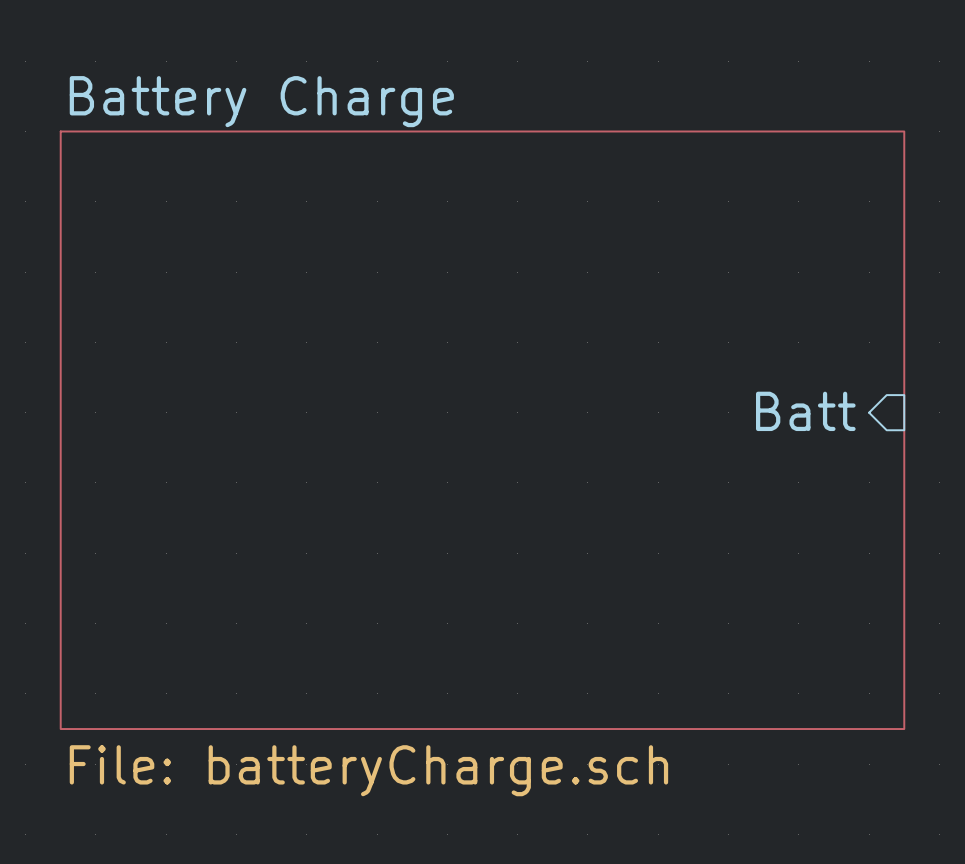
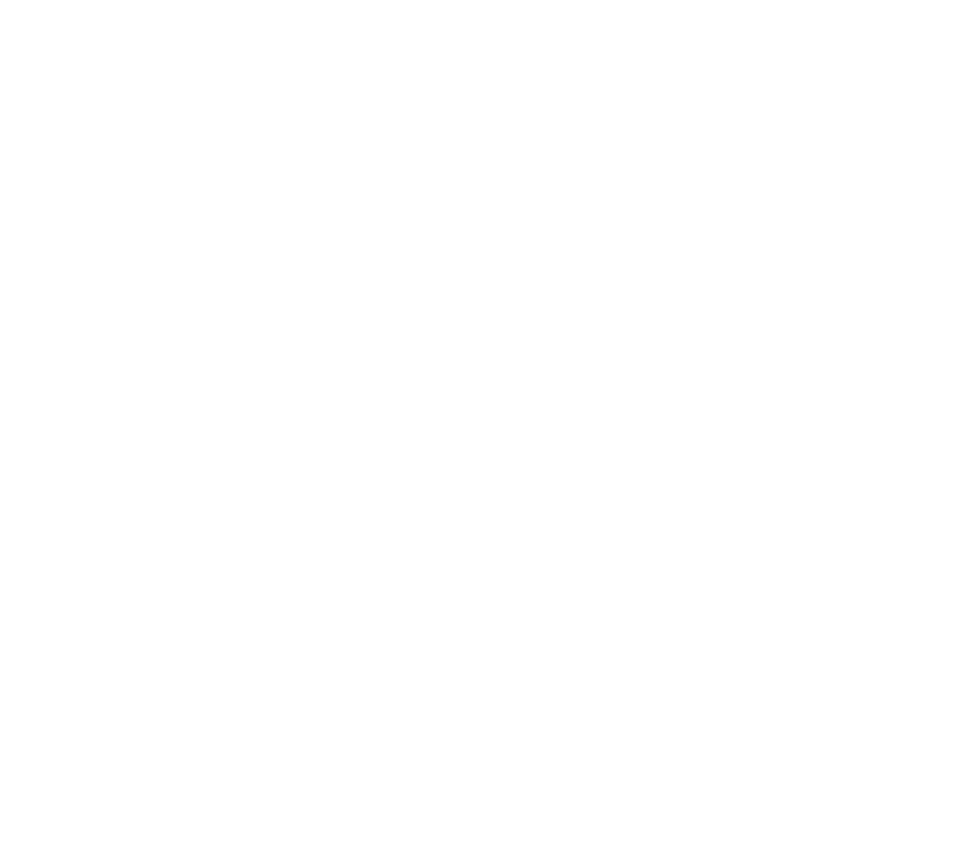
sheet pin: Batt (805, 411) -> none
sheet Battery Charge: File: batteryCharge.sch (482, 430) -> none

